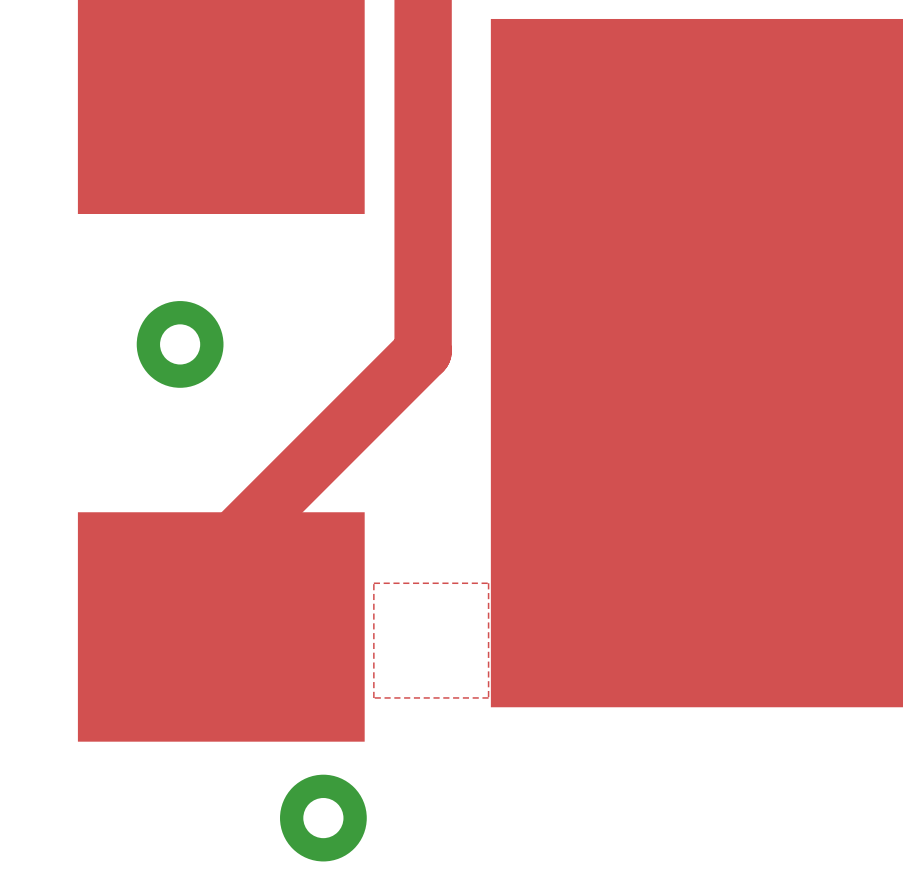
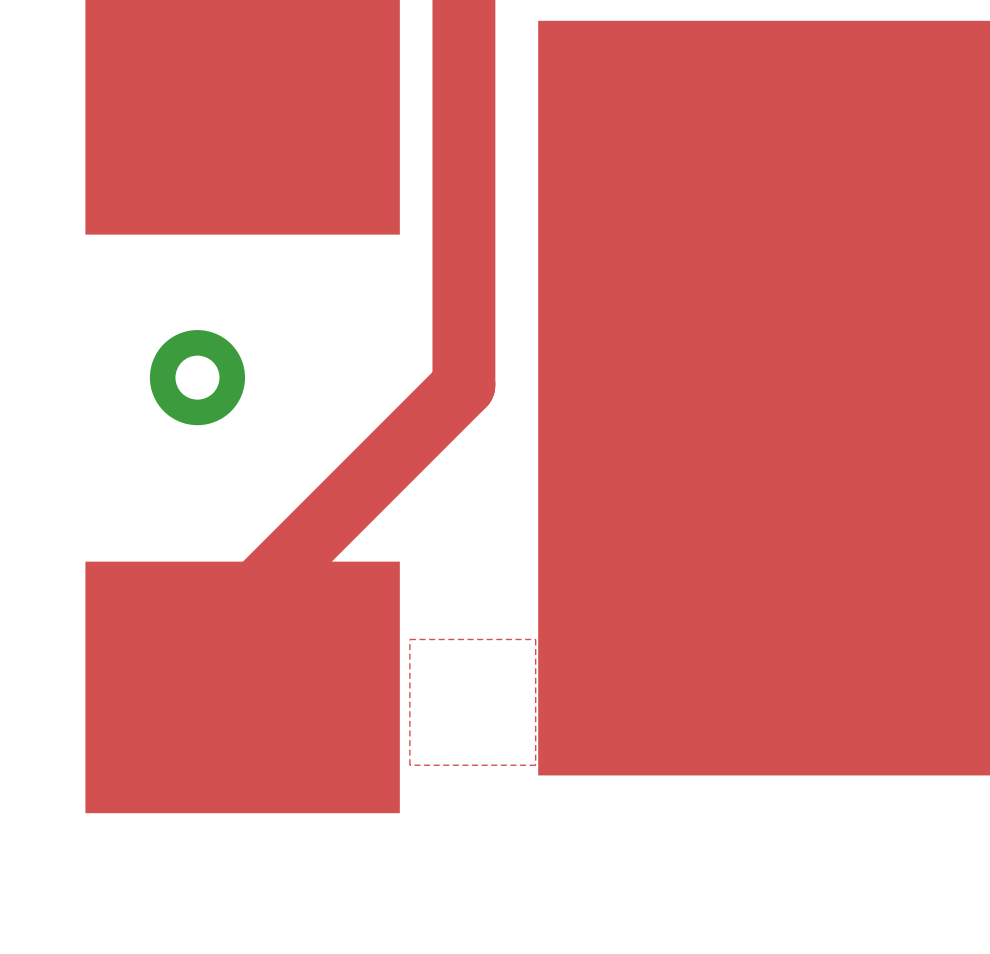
via: (323, 818) -> none

